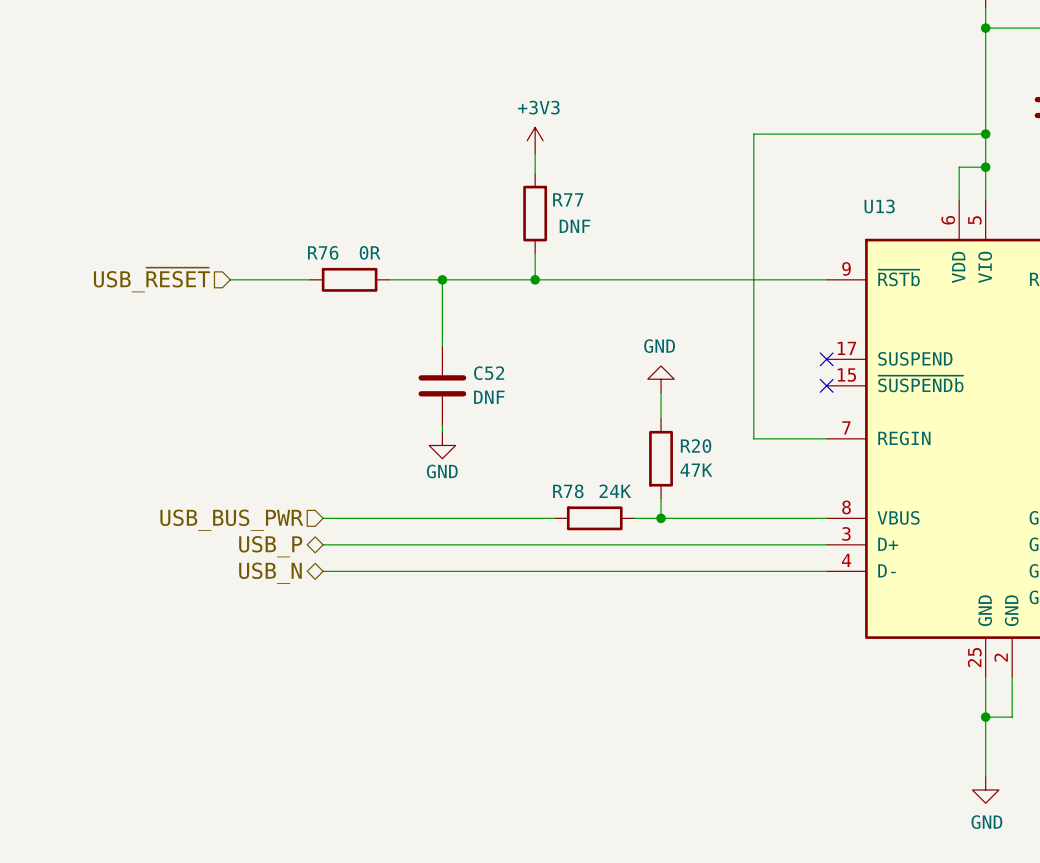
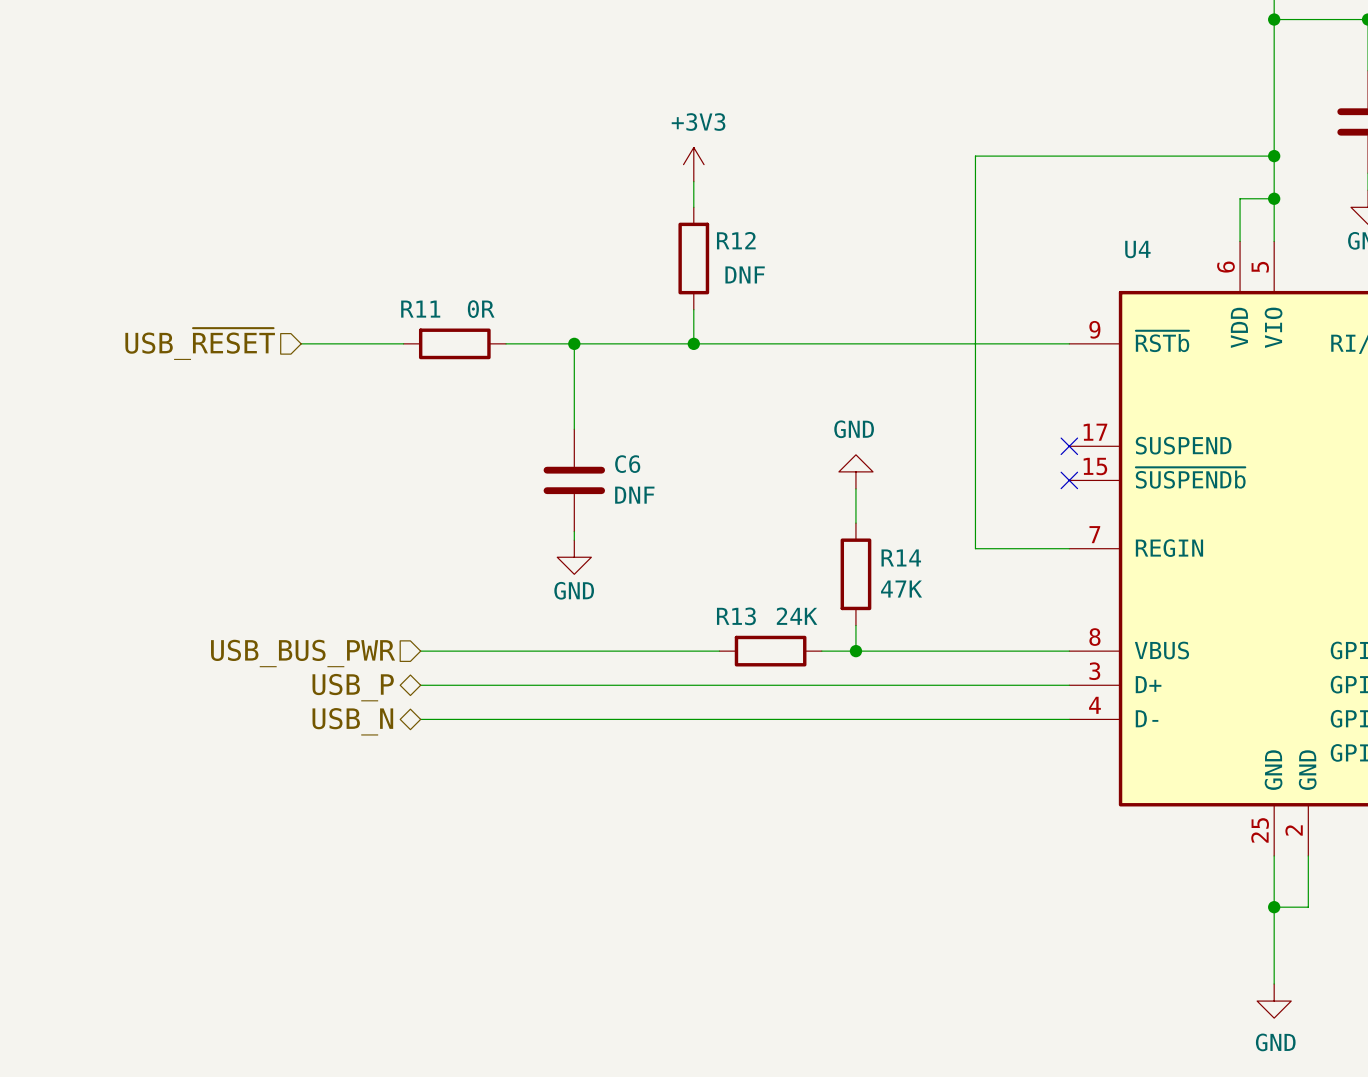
R77 name: R77 (568, 199) -> R12 (736, 240)
U13 name: U13 (879, 206) -> U4 (1137, 249)
R76 name: R76 (323, 252) -> R11 (420, 309)
C52 name: C52 (489, 373) -> C6 (627, 464)
R20 name: R20 (696, 446) -> R14 (901, 557)
R78 name: R78 (568, 491) -> R13 (736, 616)

